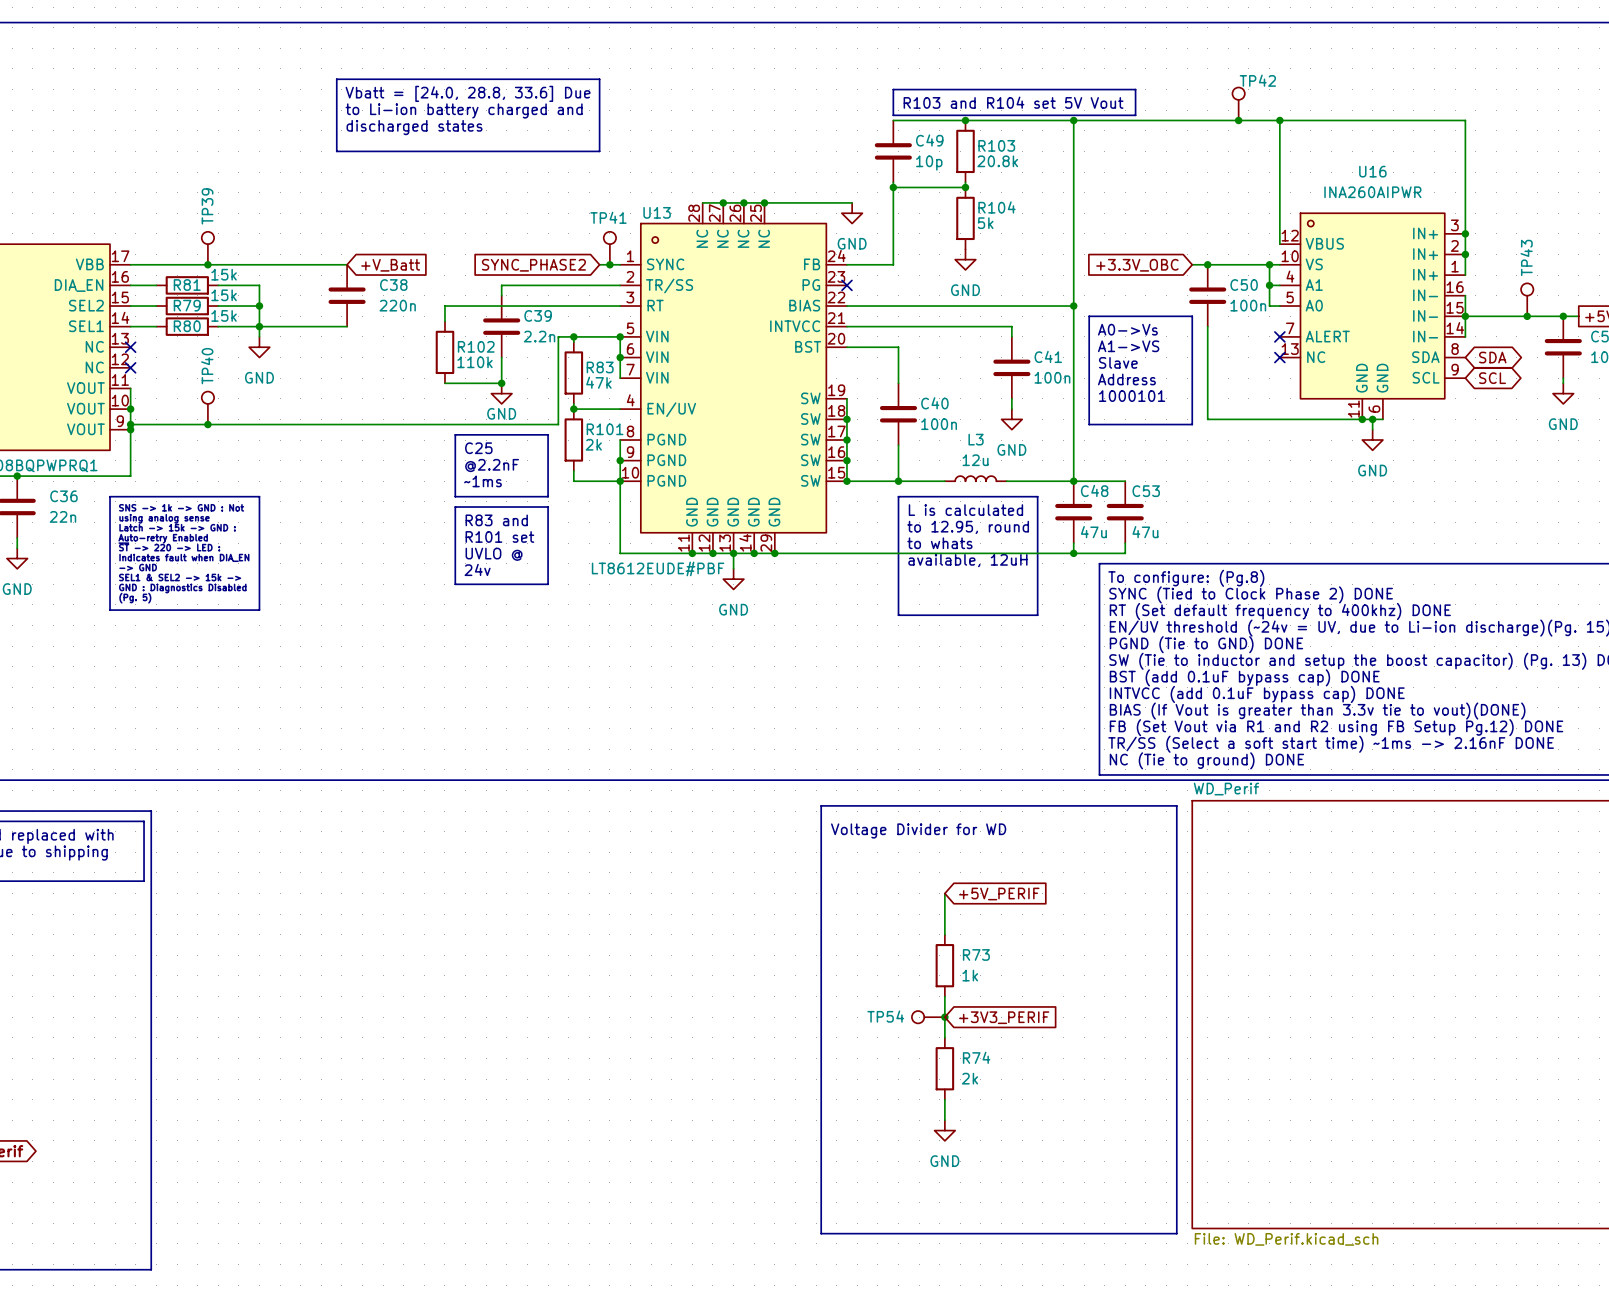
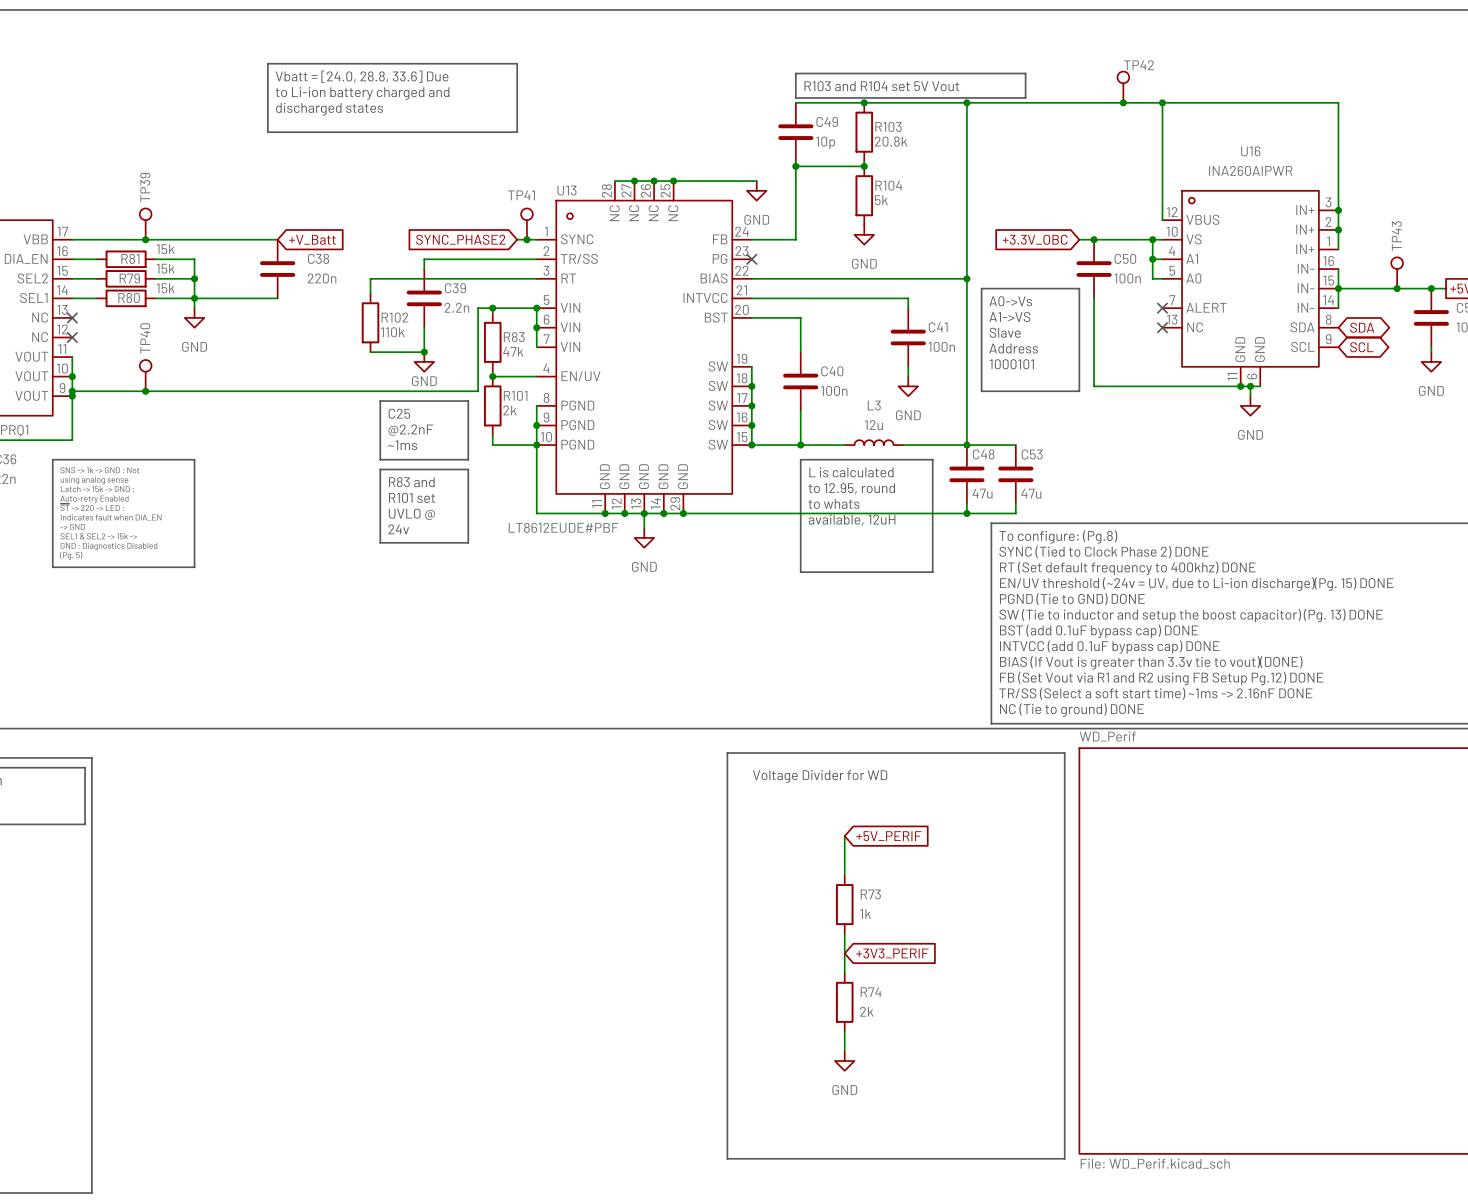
TP54: (928, 1017) -> none
junction: (944, 1017) -> none

